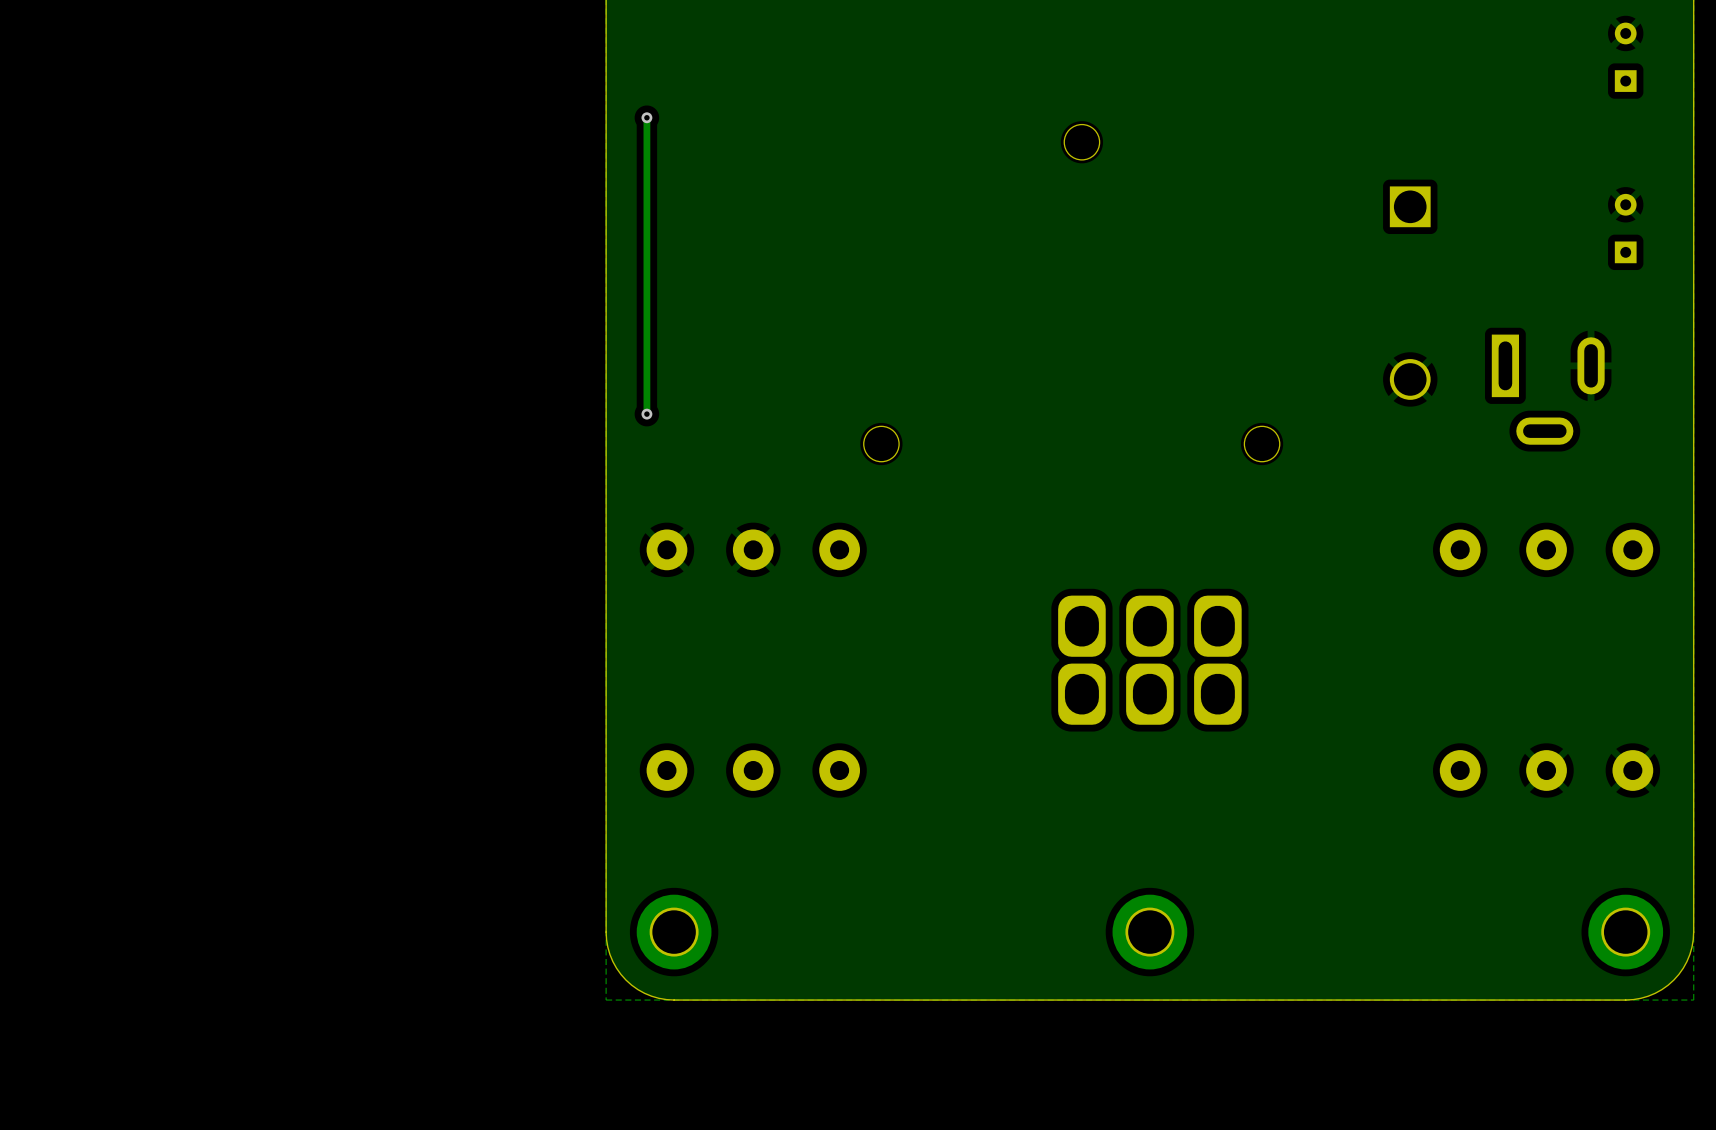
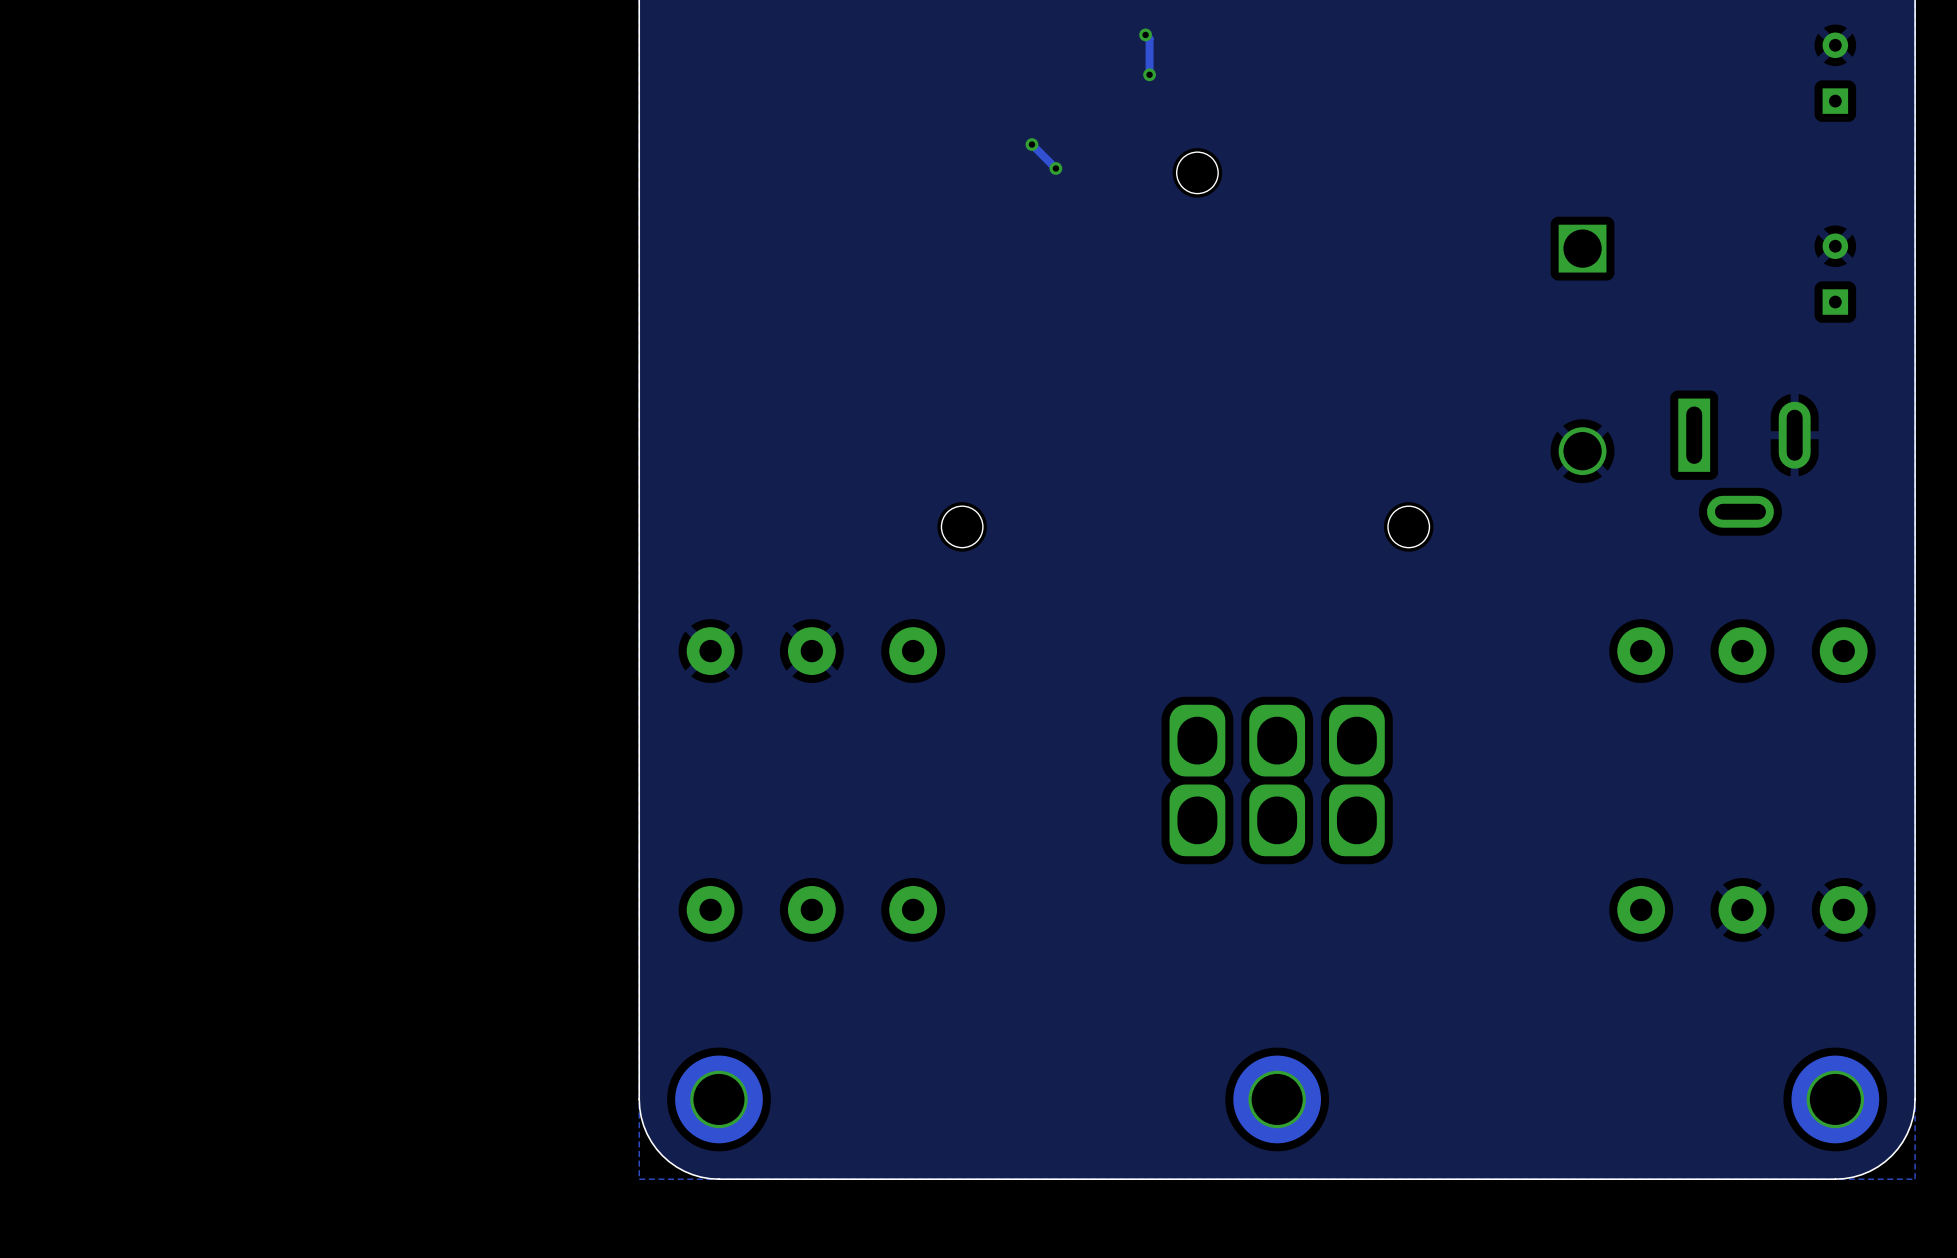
track: none -> (1145, 34) (1149, 38) (1149, 74)
via: none -> (1145, 34)
via: none -> (1149, 74)
track: (646, 117) (646, 414) -> none
via: (646, 117) -> none
track: none -> (1031, 144) (1055, 168)
via: none -> (1031, 144)
via: none -> (1055, 168)
via: (646, 414) -> none

